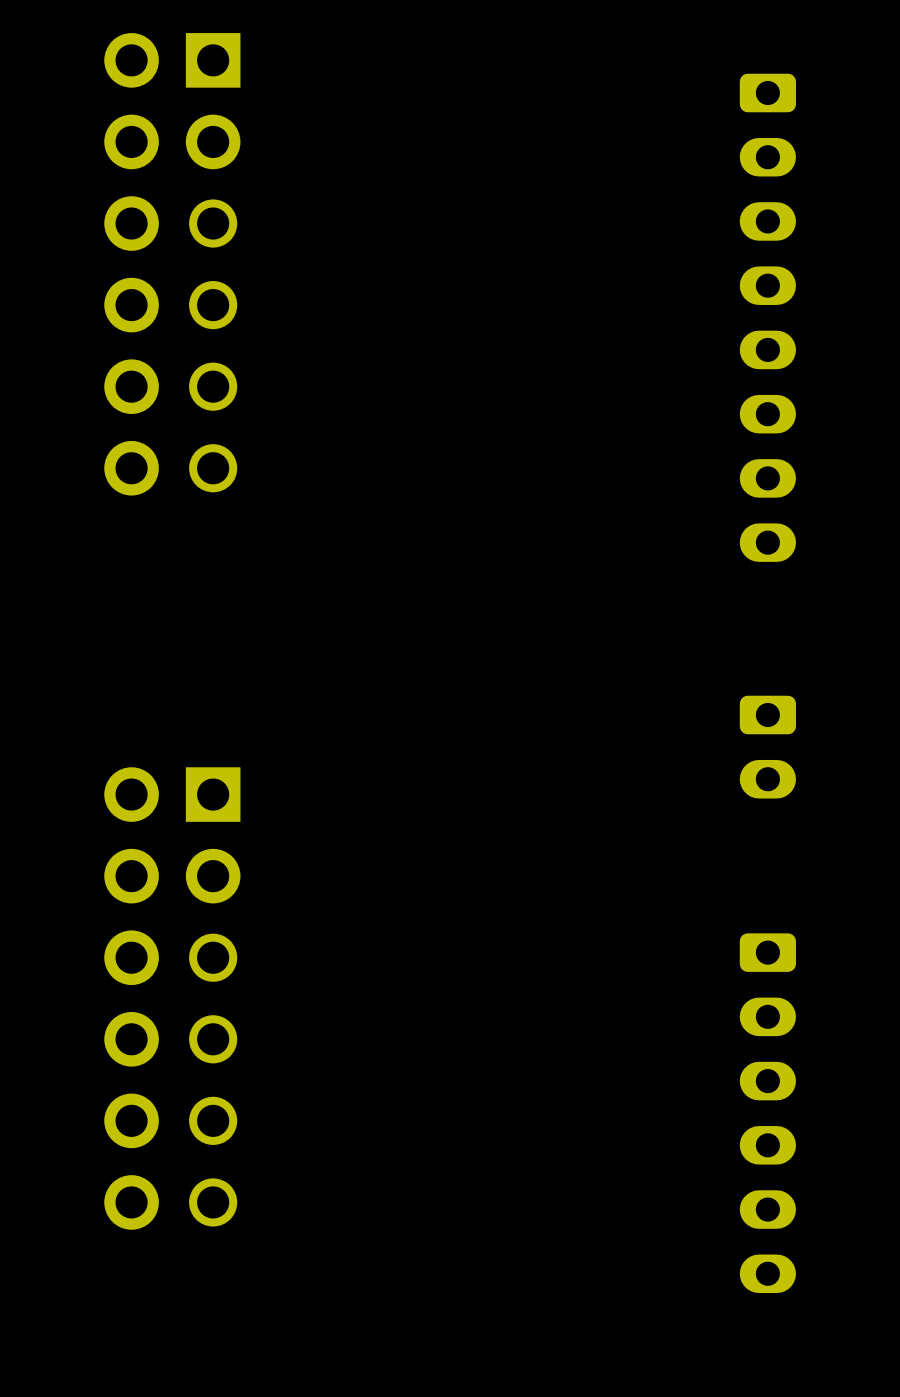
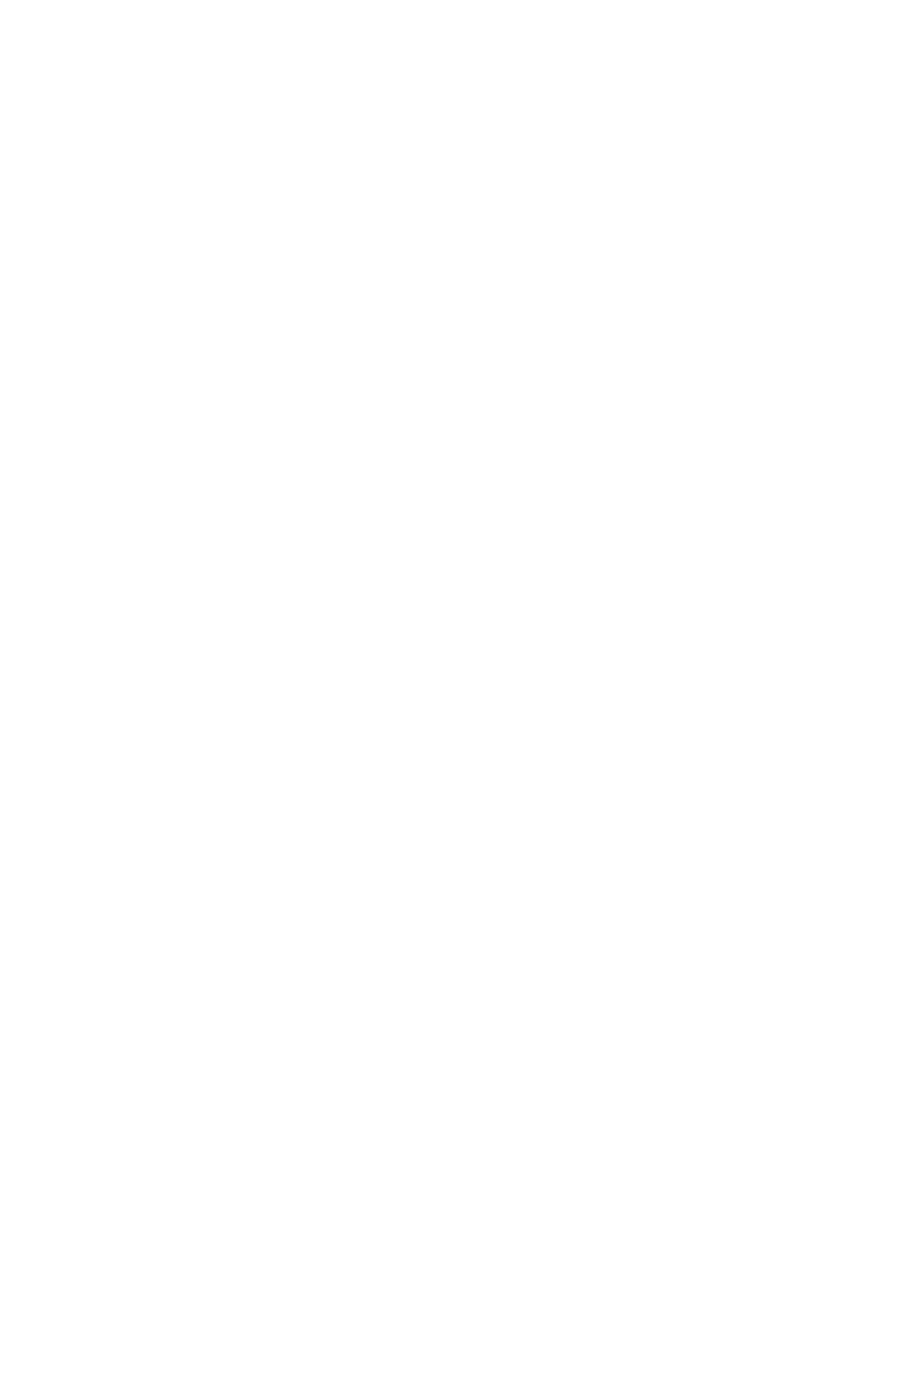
part: (172, 264) -> none
part: (767, 317) -> none
part: (767, 747) -> none
part: (172, 998) -> none
part: (767, 1113) -> none

